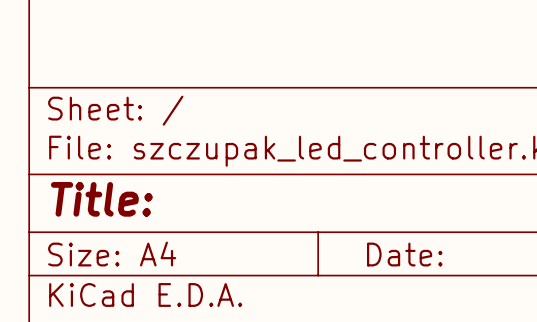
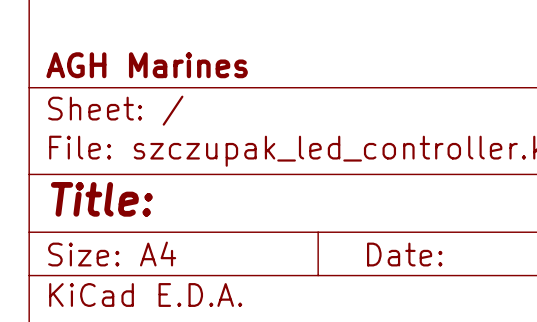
title block: none -> AGH Marines (147, 65)

